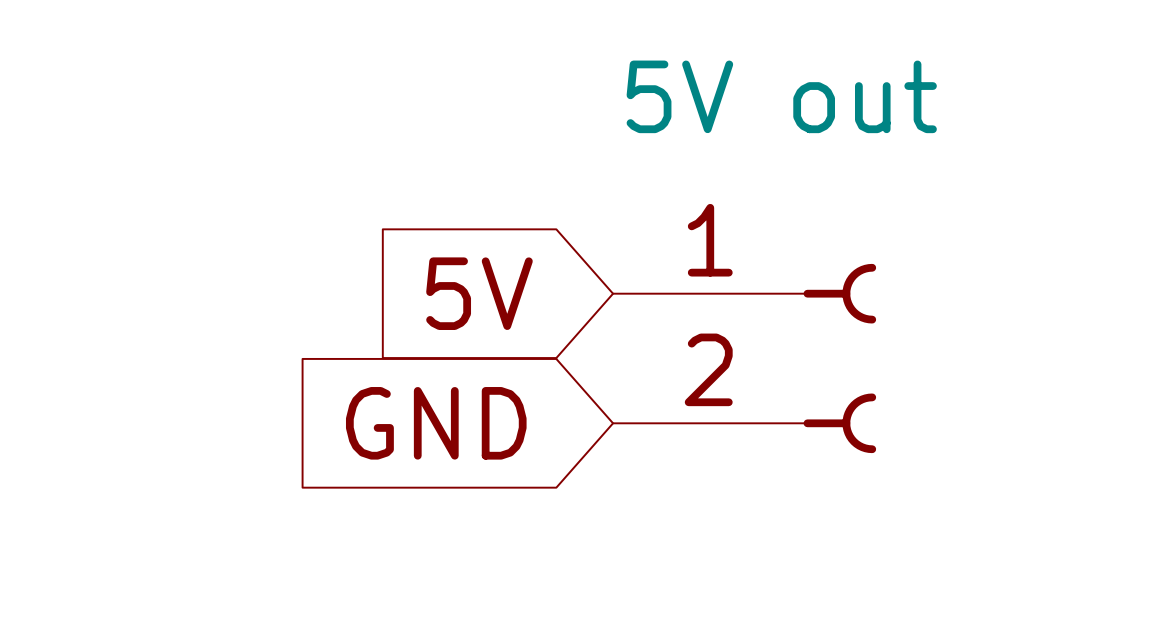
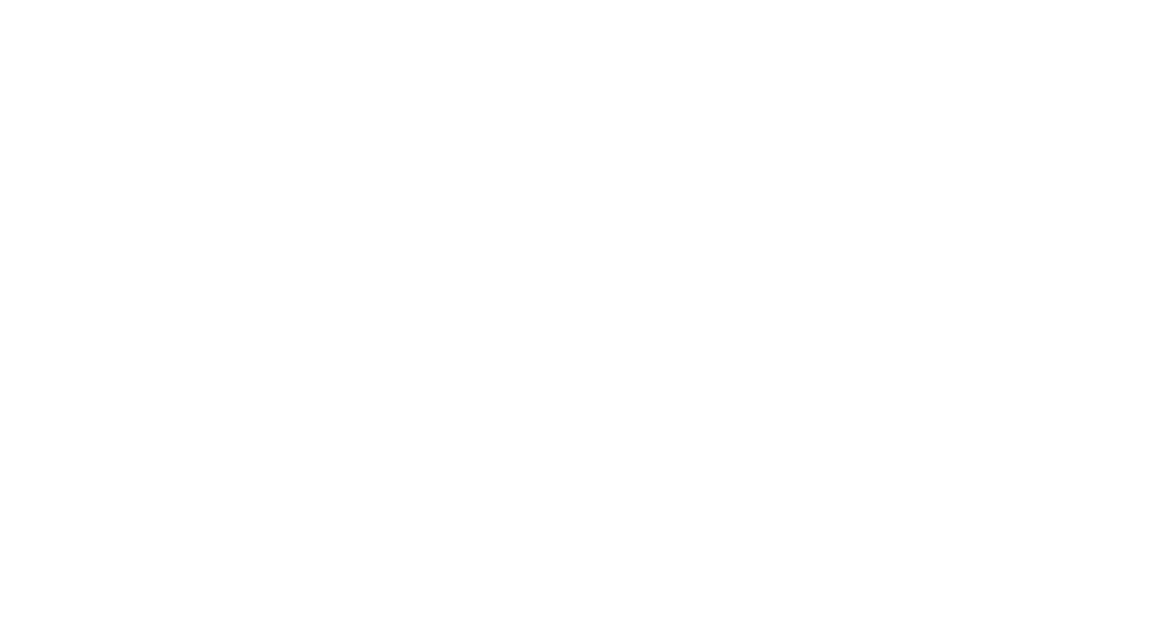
global label: 5V (479, 293) -> none
part: 5V out (744, 358) -> none
global label: GND (436, 423) -> none

